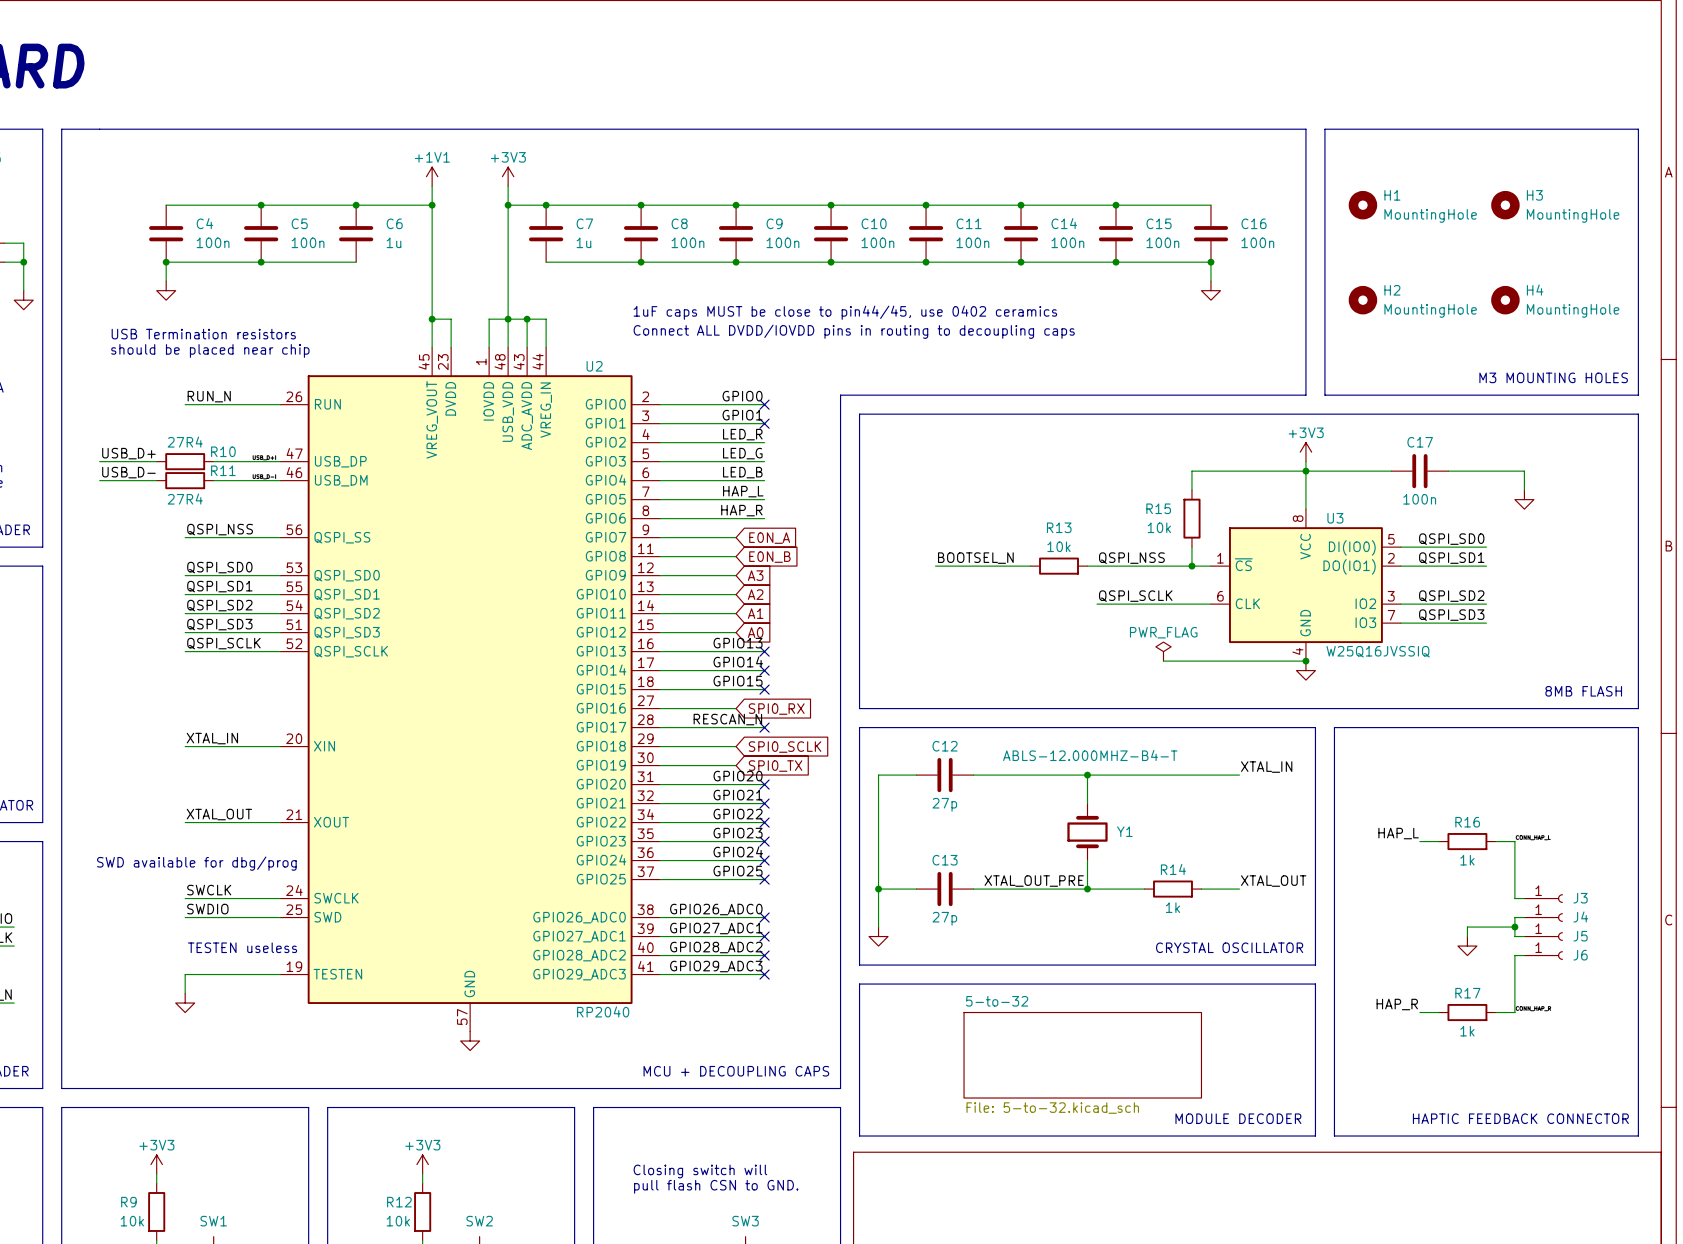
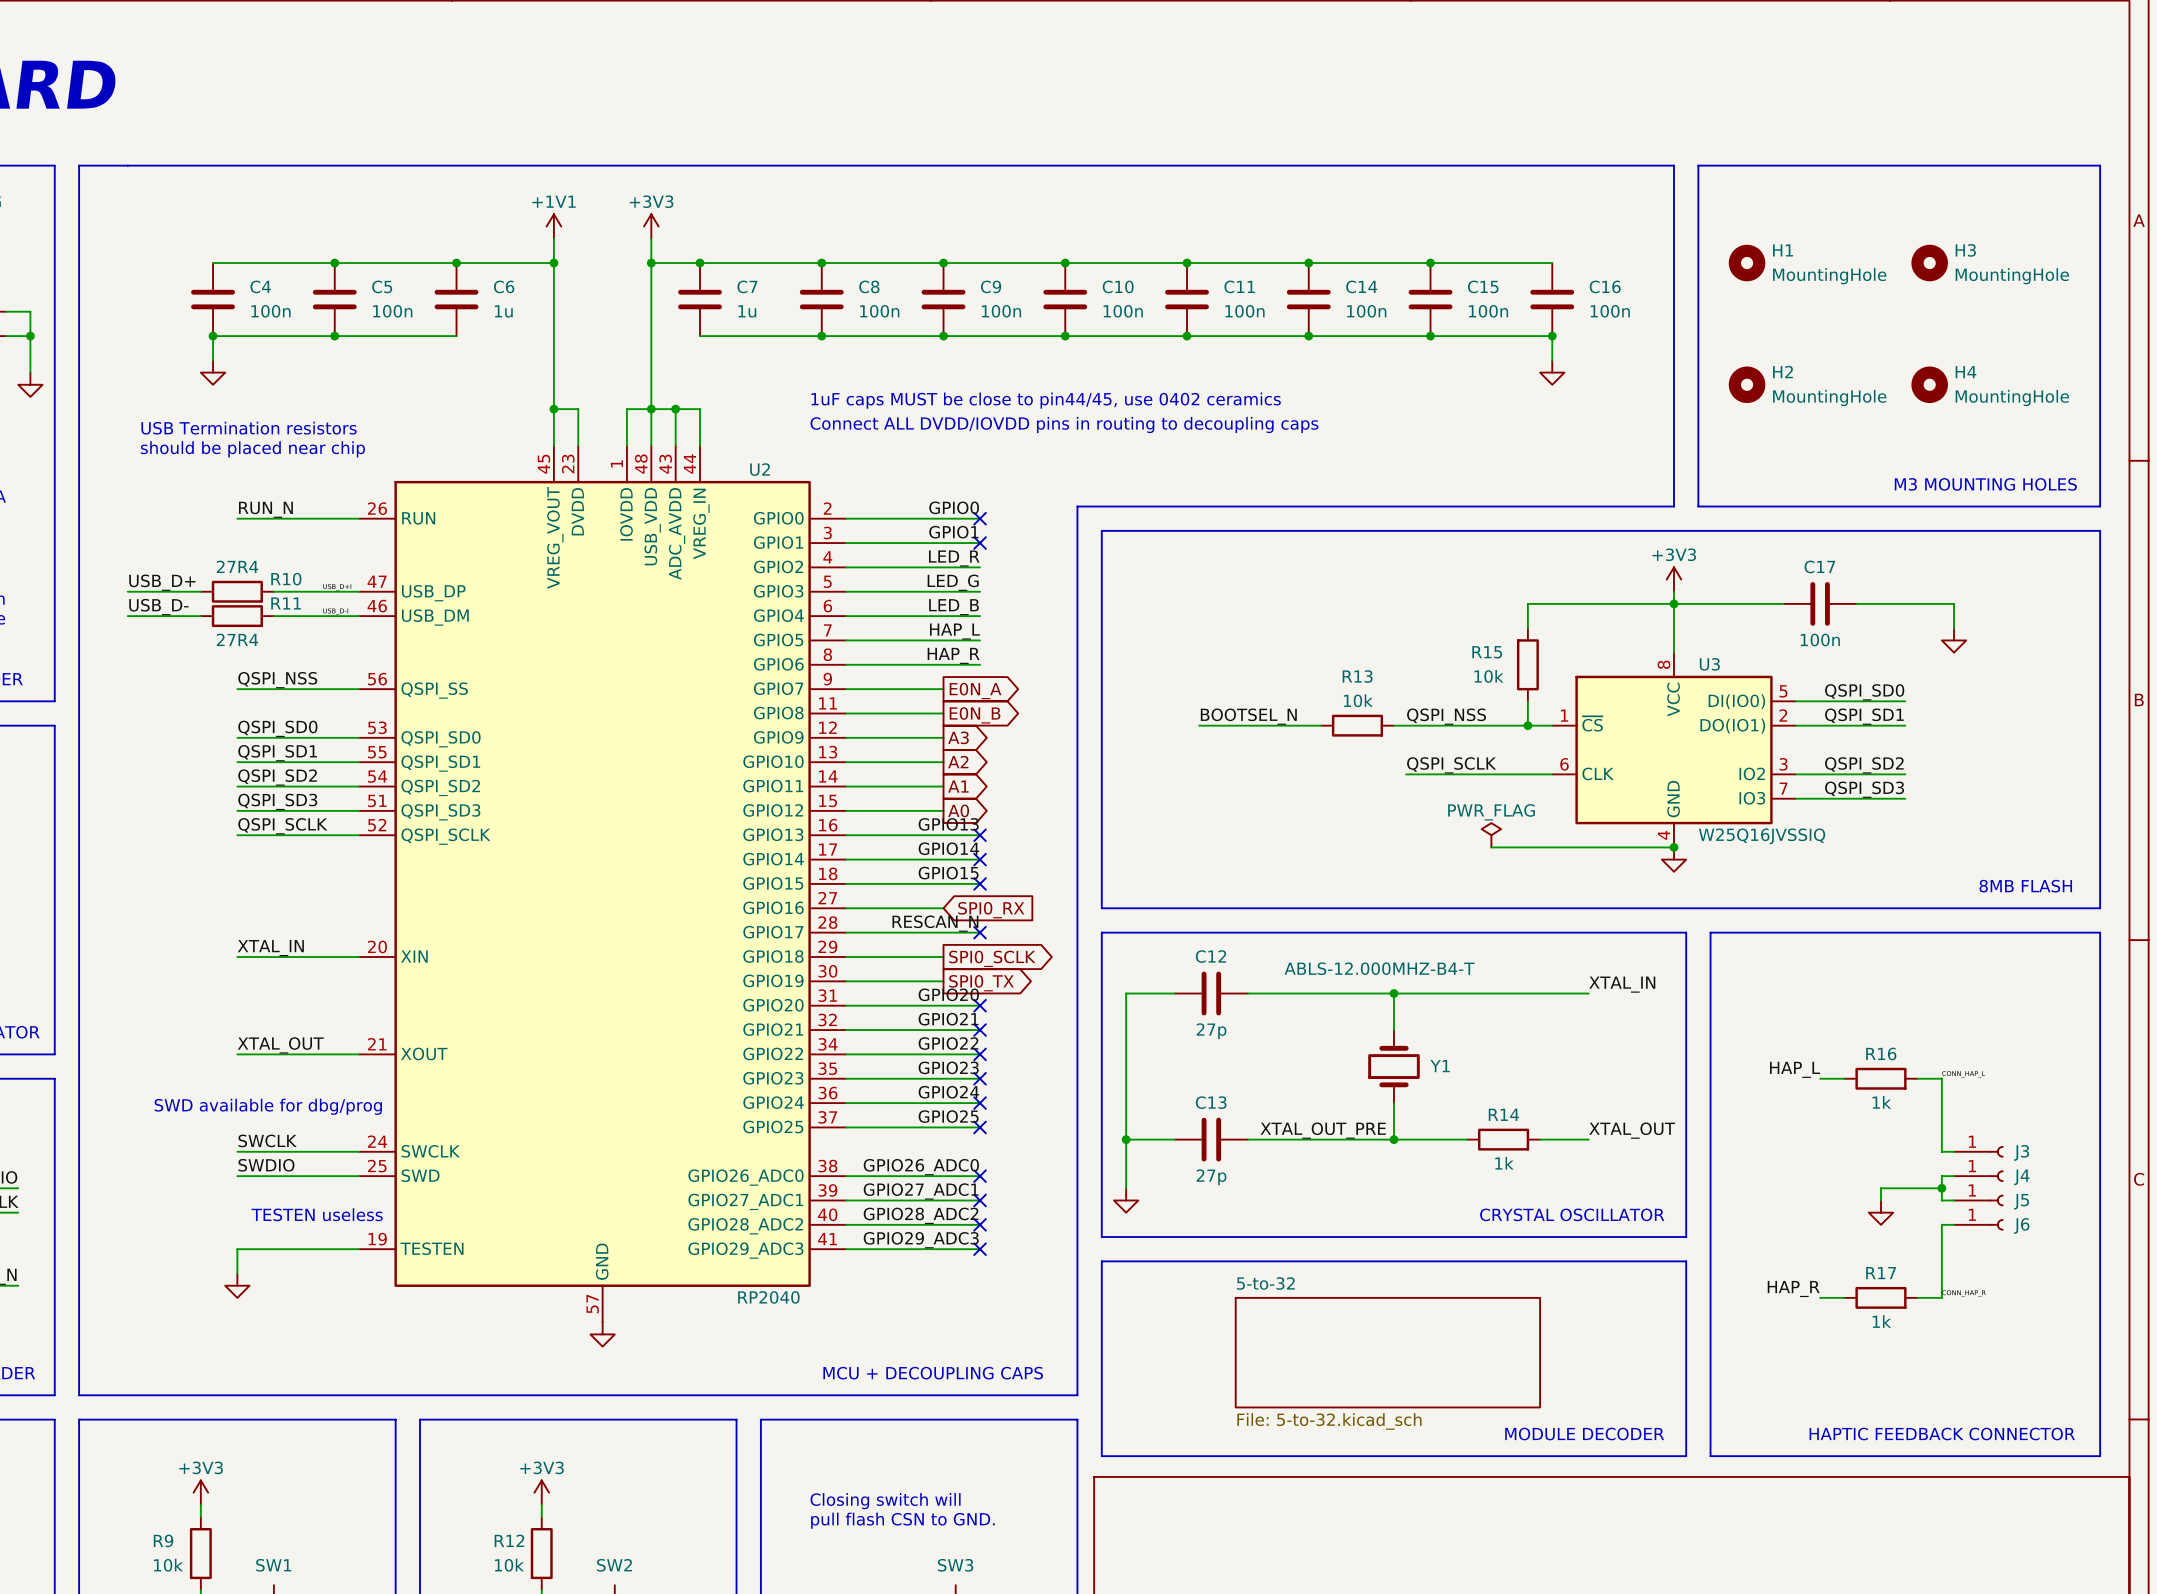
global label shape: input (769, 538) -> output (975, 691)
global label shape: input (769, 557) -> output (975, 715)
global label shape: input (755, 575) -> output (958, 737)
global label shape: input (755, 594) -> output (958, 762)
global label shape: input (755, 613) -> output (958, 786)
global label shape: input (755, 632) -> output (958, 810)
global label shape: input (785, 747) -> output (992, 958)
global label shape: input (775, 766) -> output (981, 983)

